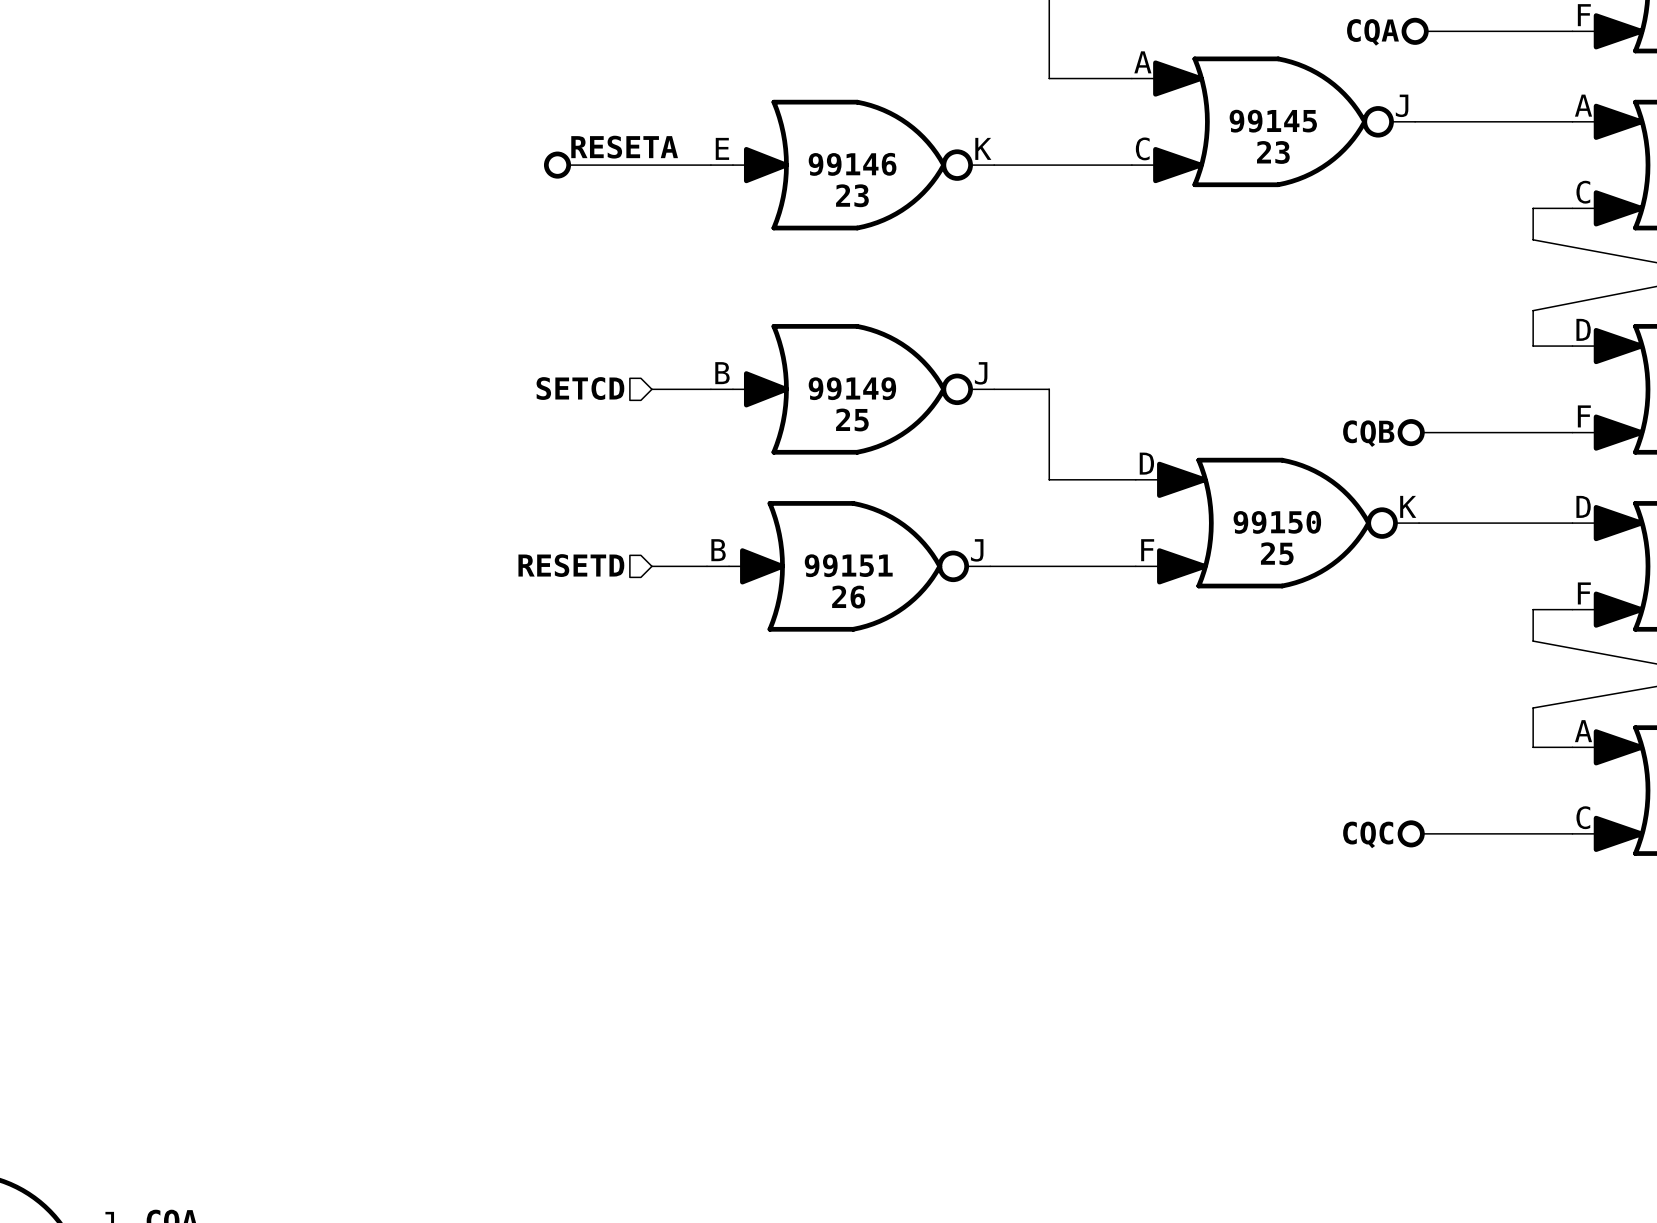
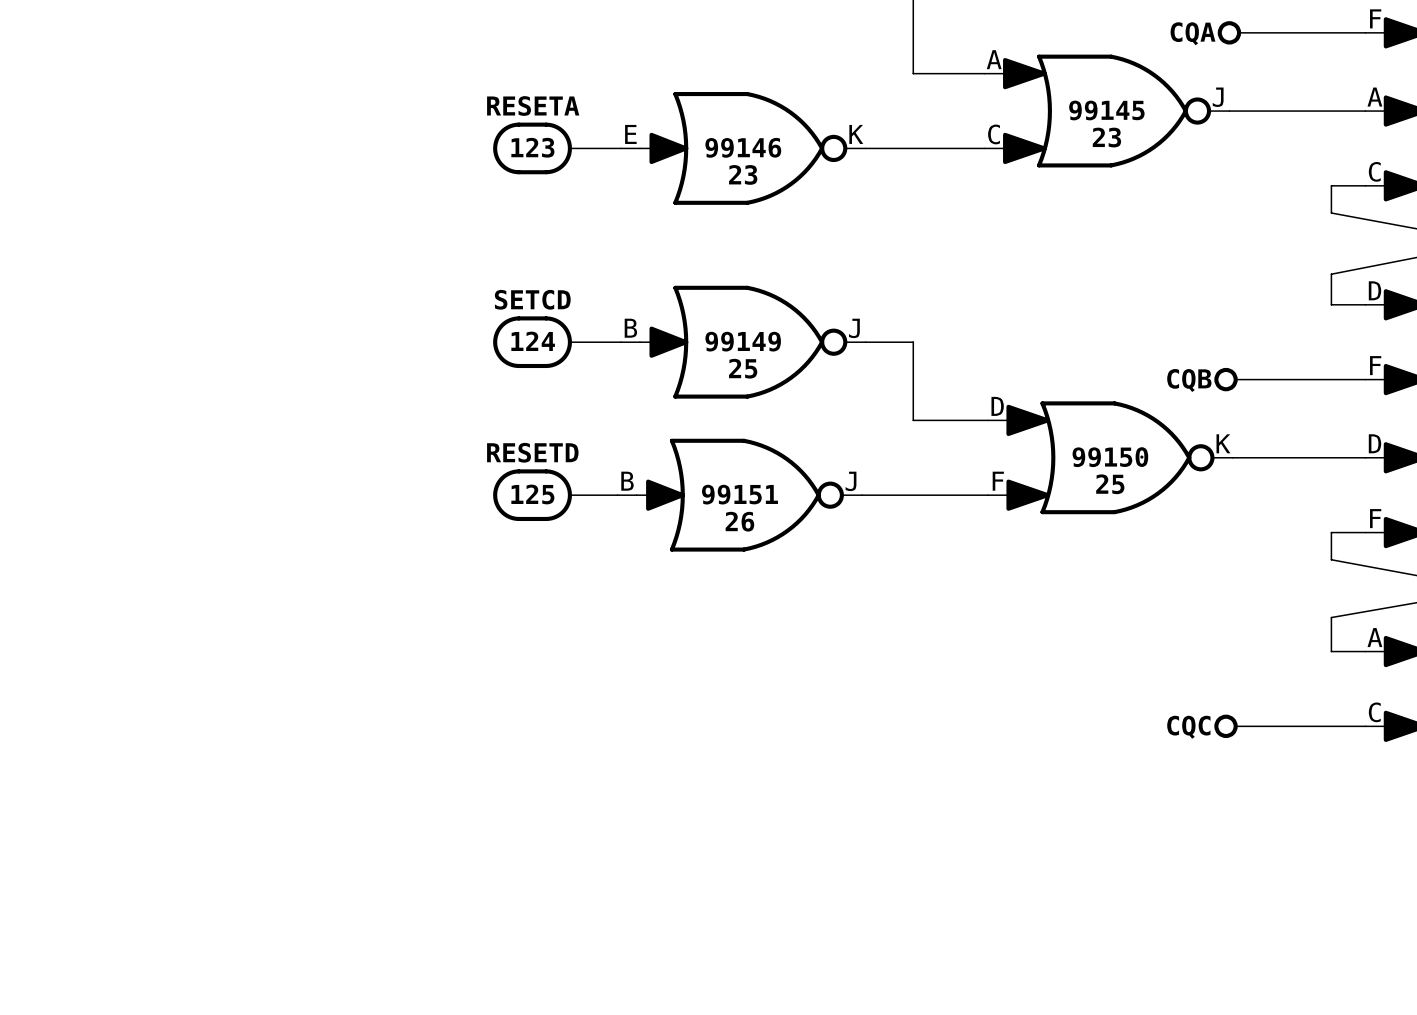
label: RESETA (624, 147) -> none
part: (557, 165) -> none
wire: (569, 165) (651, 165) -> none
part: none -> (532, 148)
hierarchical label: SETCD (580, 388) -> none
part: none -> (532, 342)
hierarchical label: RESETD (571, 565) -> none
part: none -> (532, 495)

